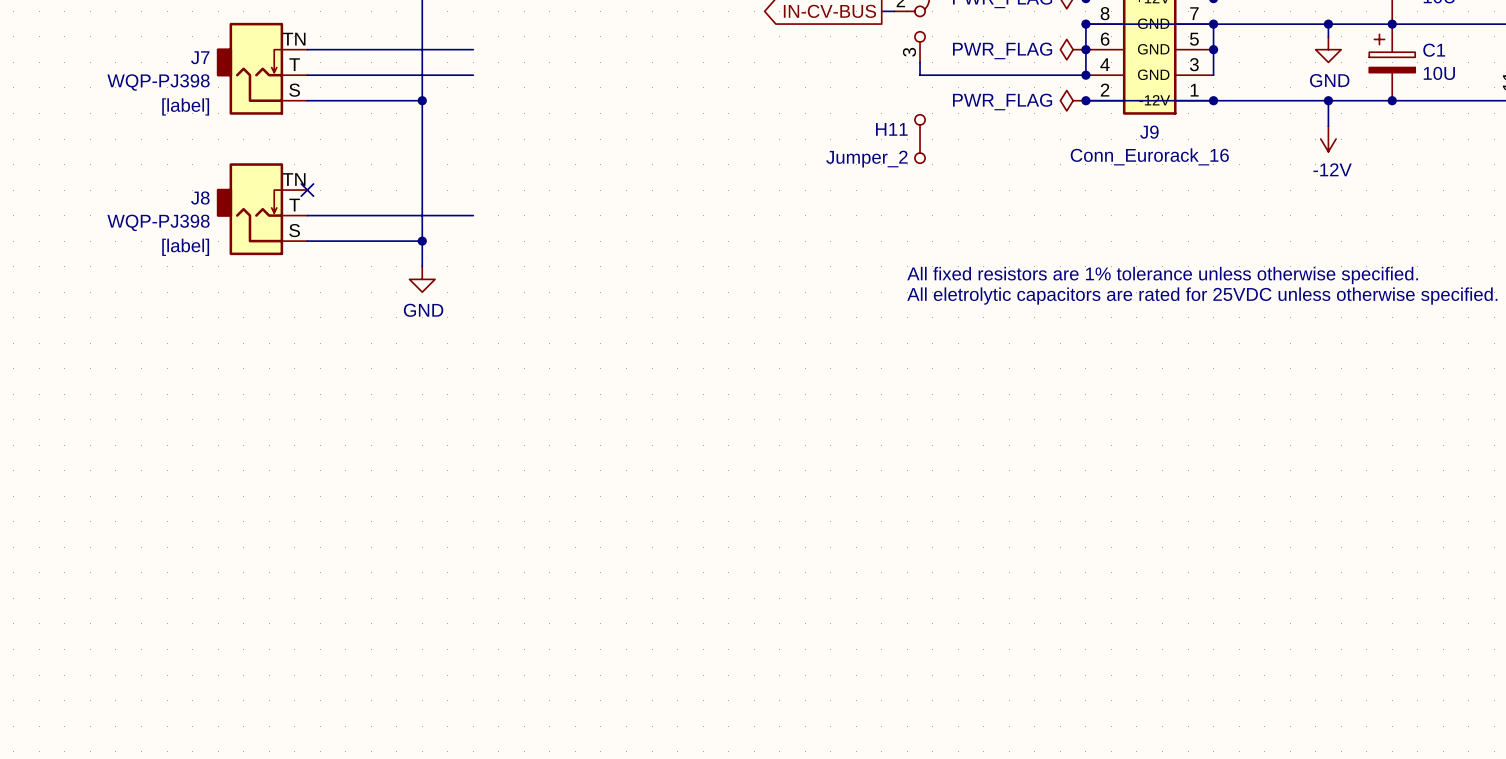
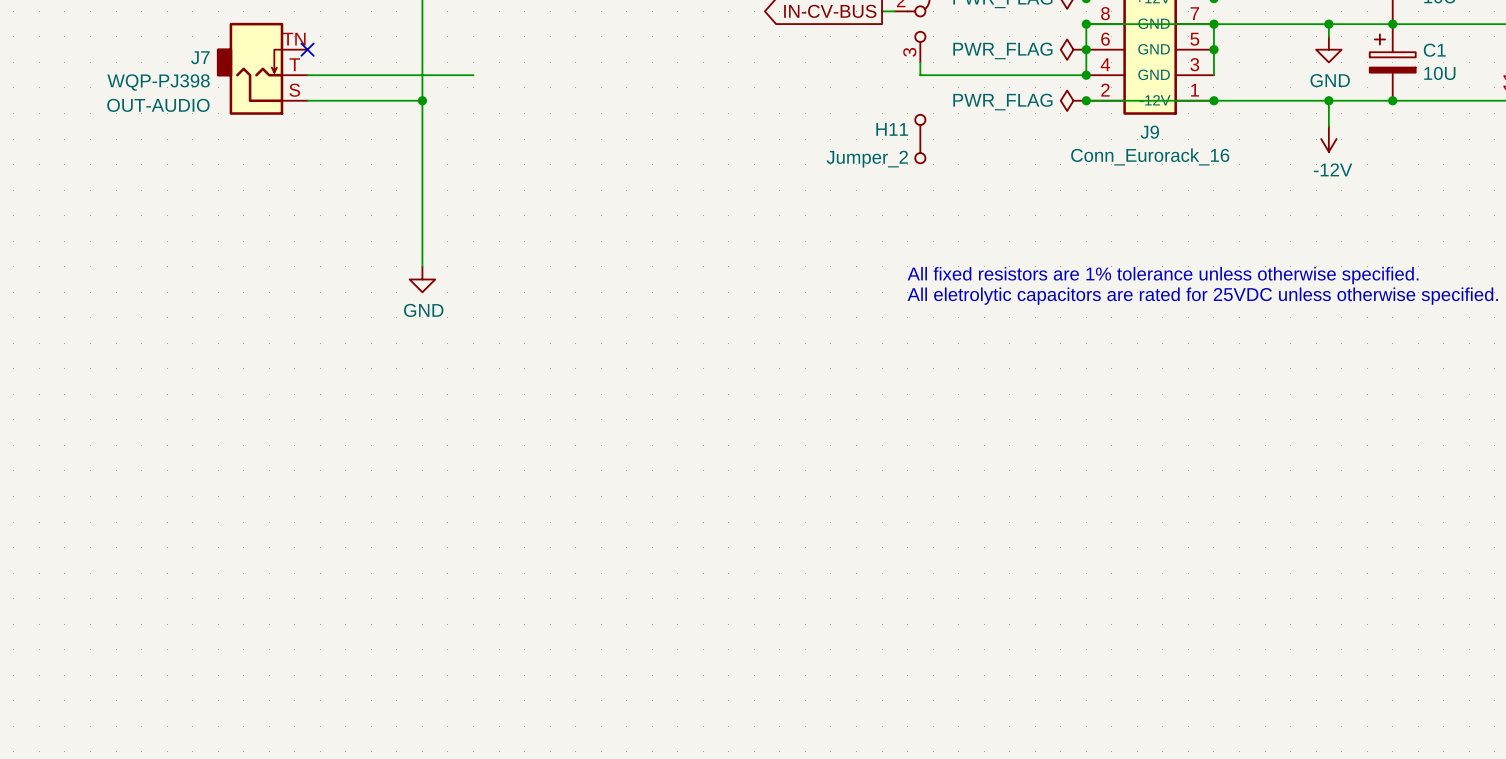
wire: (307, 49) (473, 49) -> none
no-connect mark: none -> (307, 49)
J7 text: [label] (185, 106) -> OUT-AUDIO (158, 105)
no-connect mark: (307, 190) -> none
J8: WQP-PJ398 (262, 209) -> none
wire: (307, 215) (473, 215) -> none
wire: (307, 241) (422, 241) -> none
junction: (422, 241) -> none

